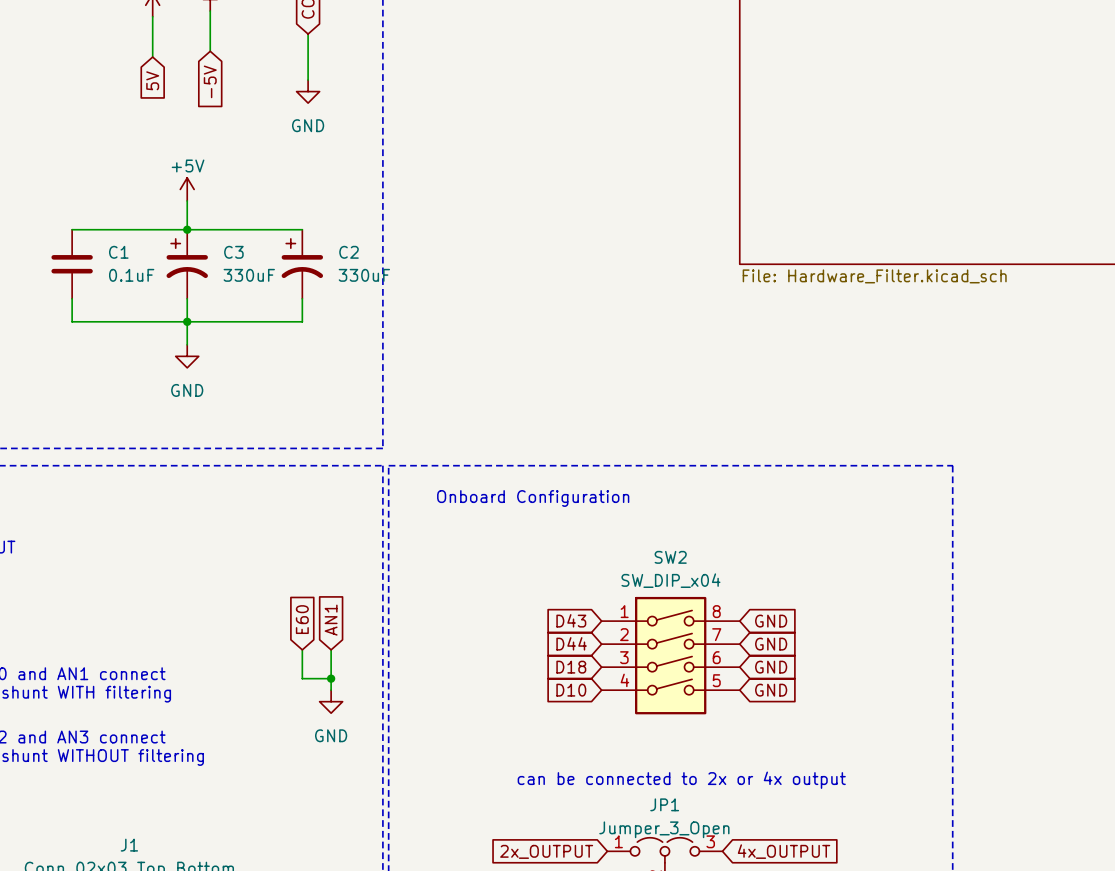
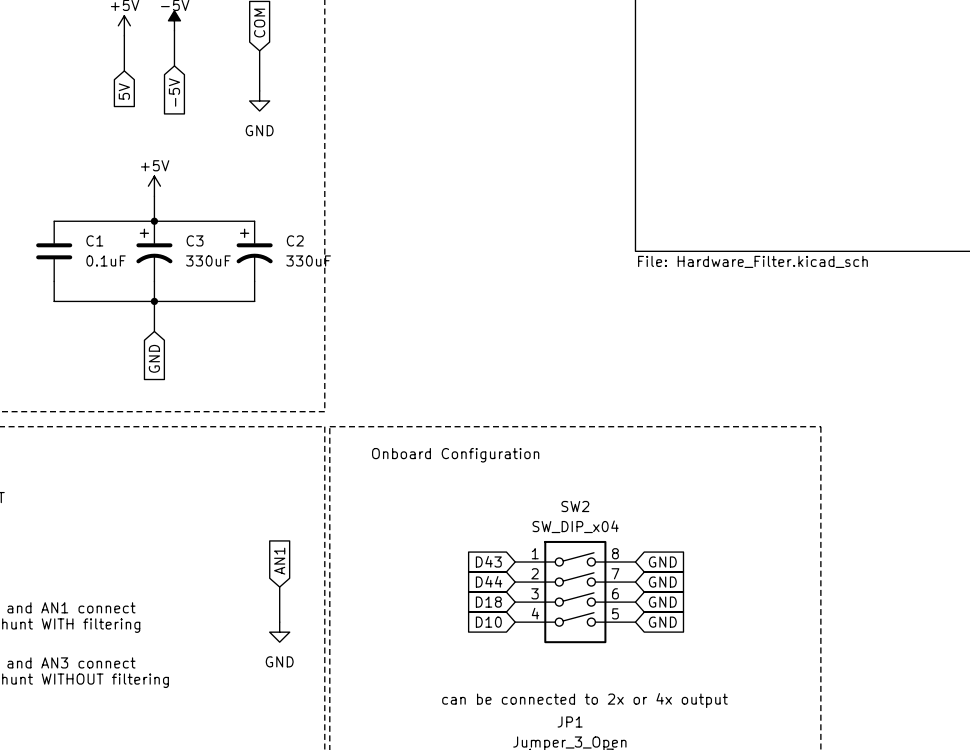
power symbol: GND (187, 356) -> none
global label: none -> GND (154, 358)
global label: E60 (302, 619) -> none
wire: (302, 649) (302, 678) (331, 678) -> none
junction: (331, 678) -> none

